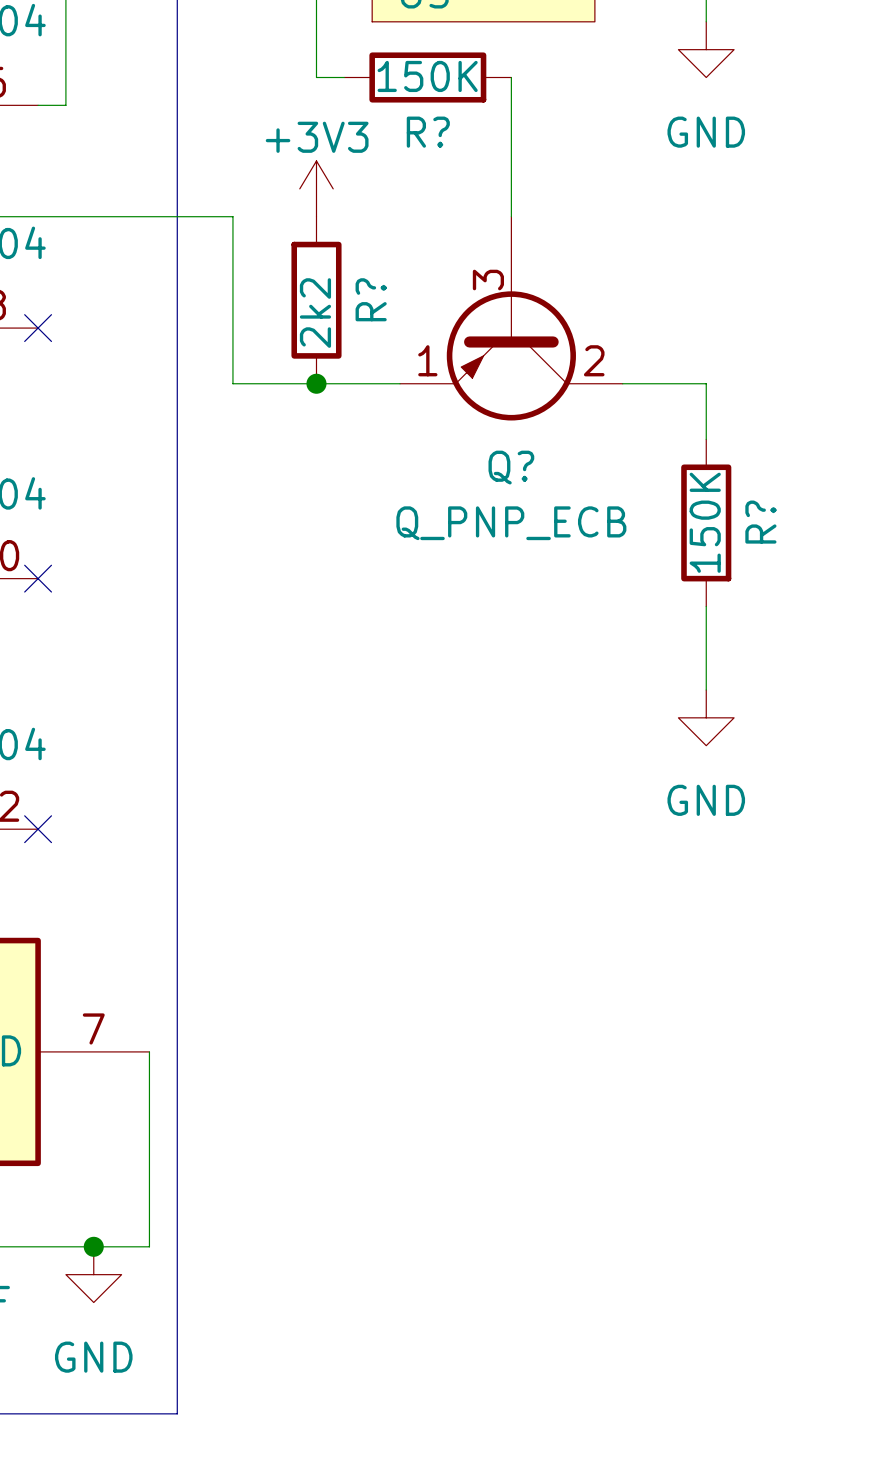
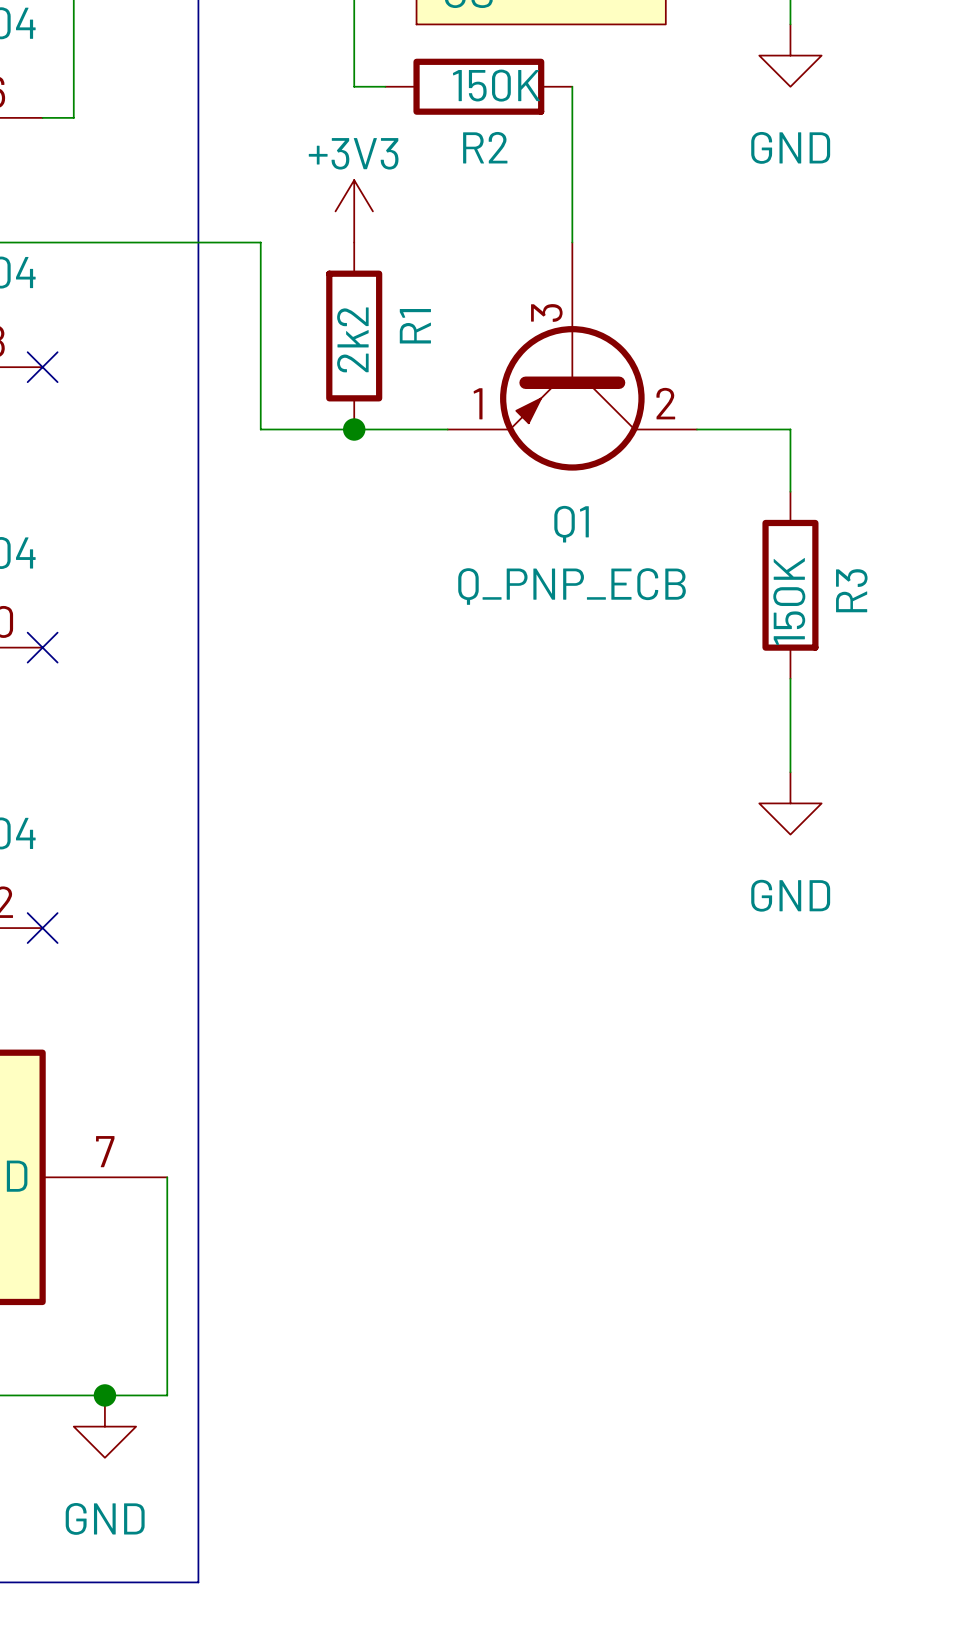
R? name: R? (428, 132) -> R2 (485, 147)
R? name: R? (371, 299) -> R1 (415, 326)
Q? name: Q? (511, 467) -> Q1 (571, 524)
R? name: R? (760, 522) -> R3 (851, 590)

